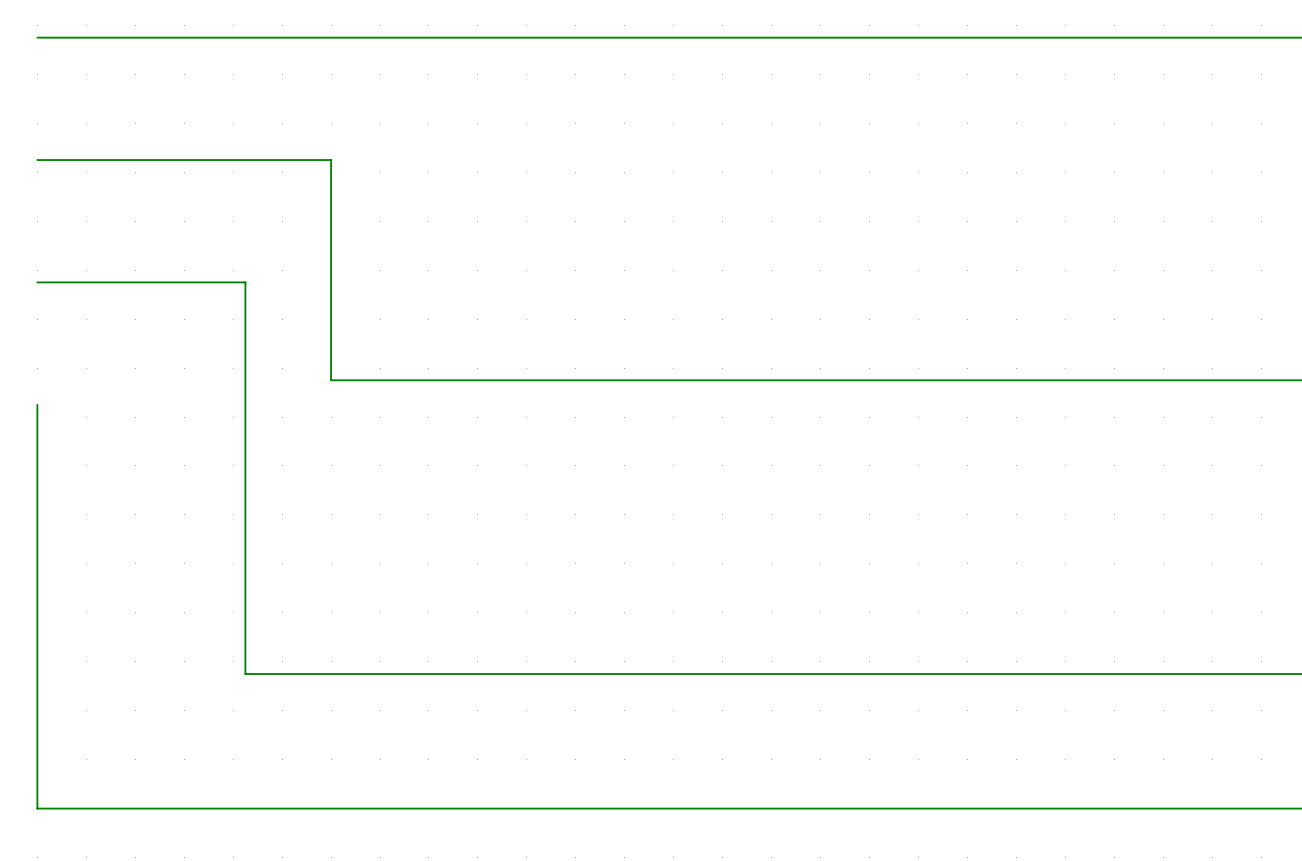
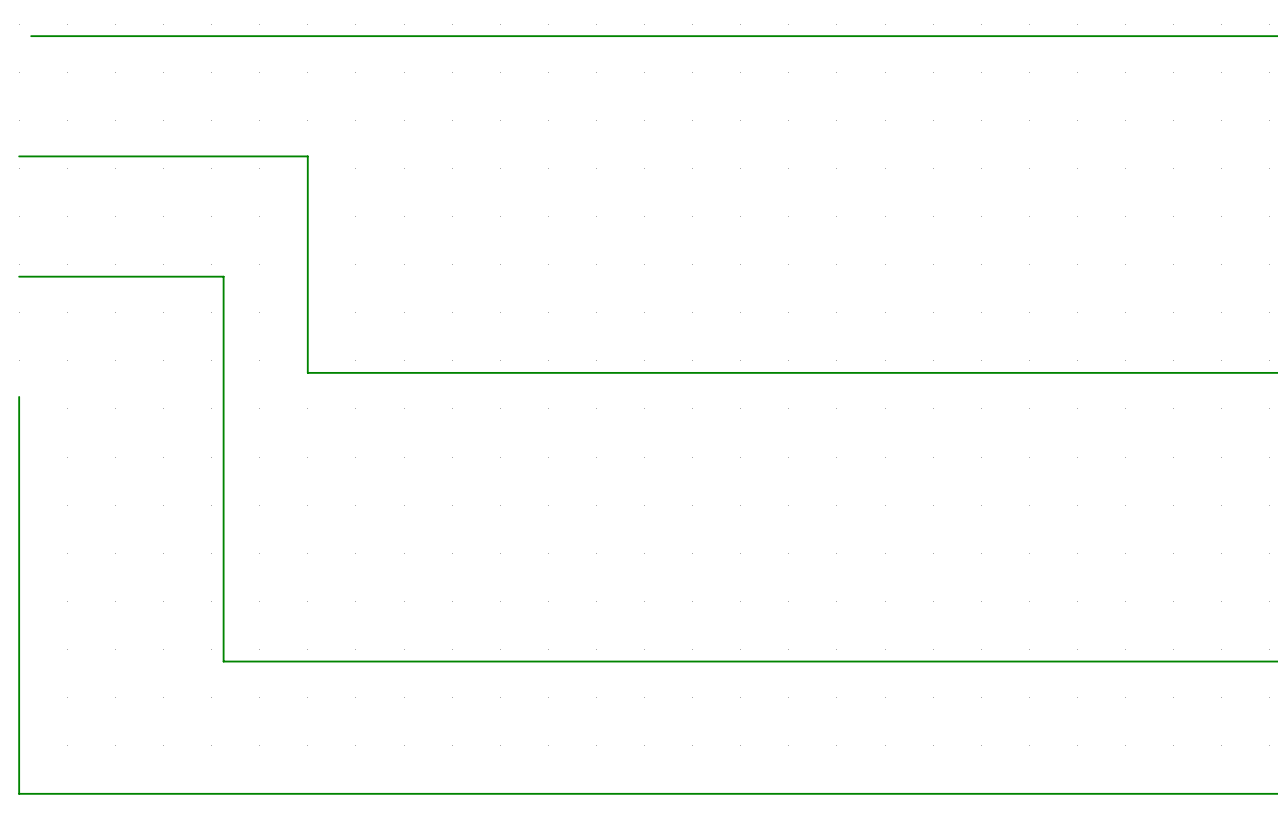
wire: (37, 37) (49, 37) -> none

